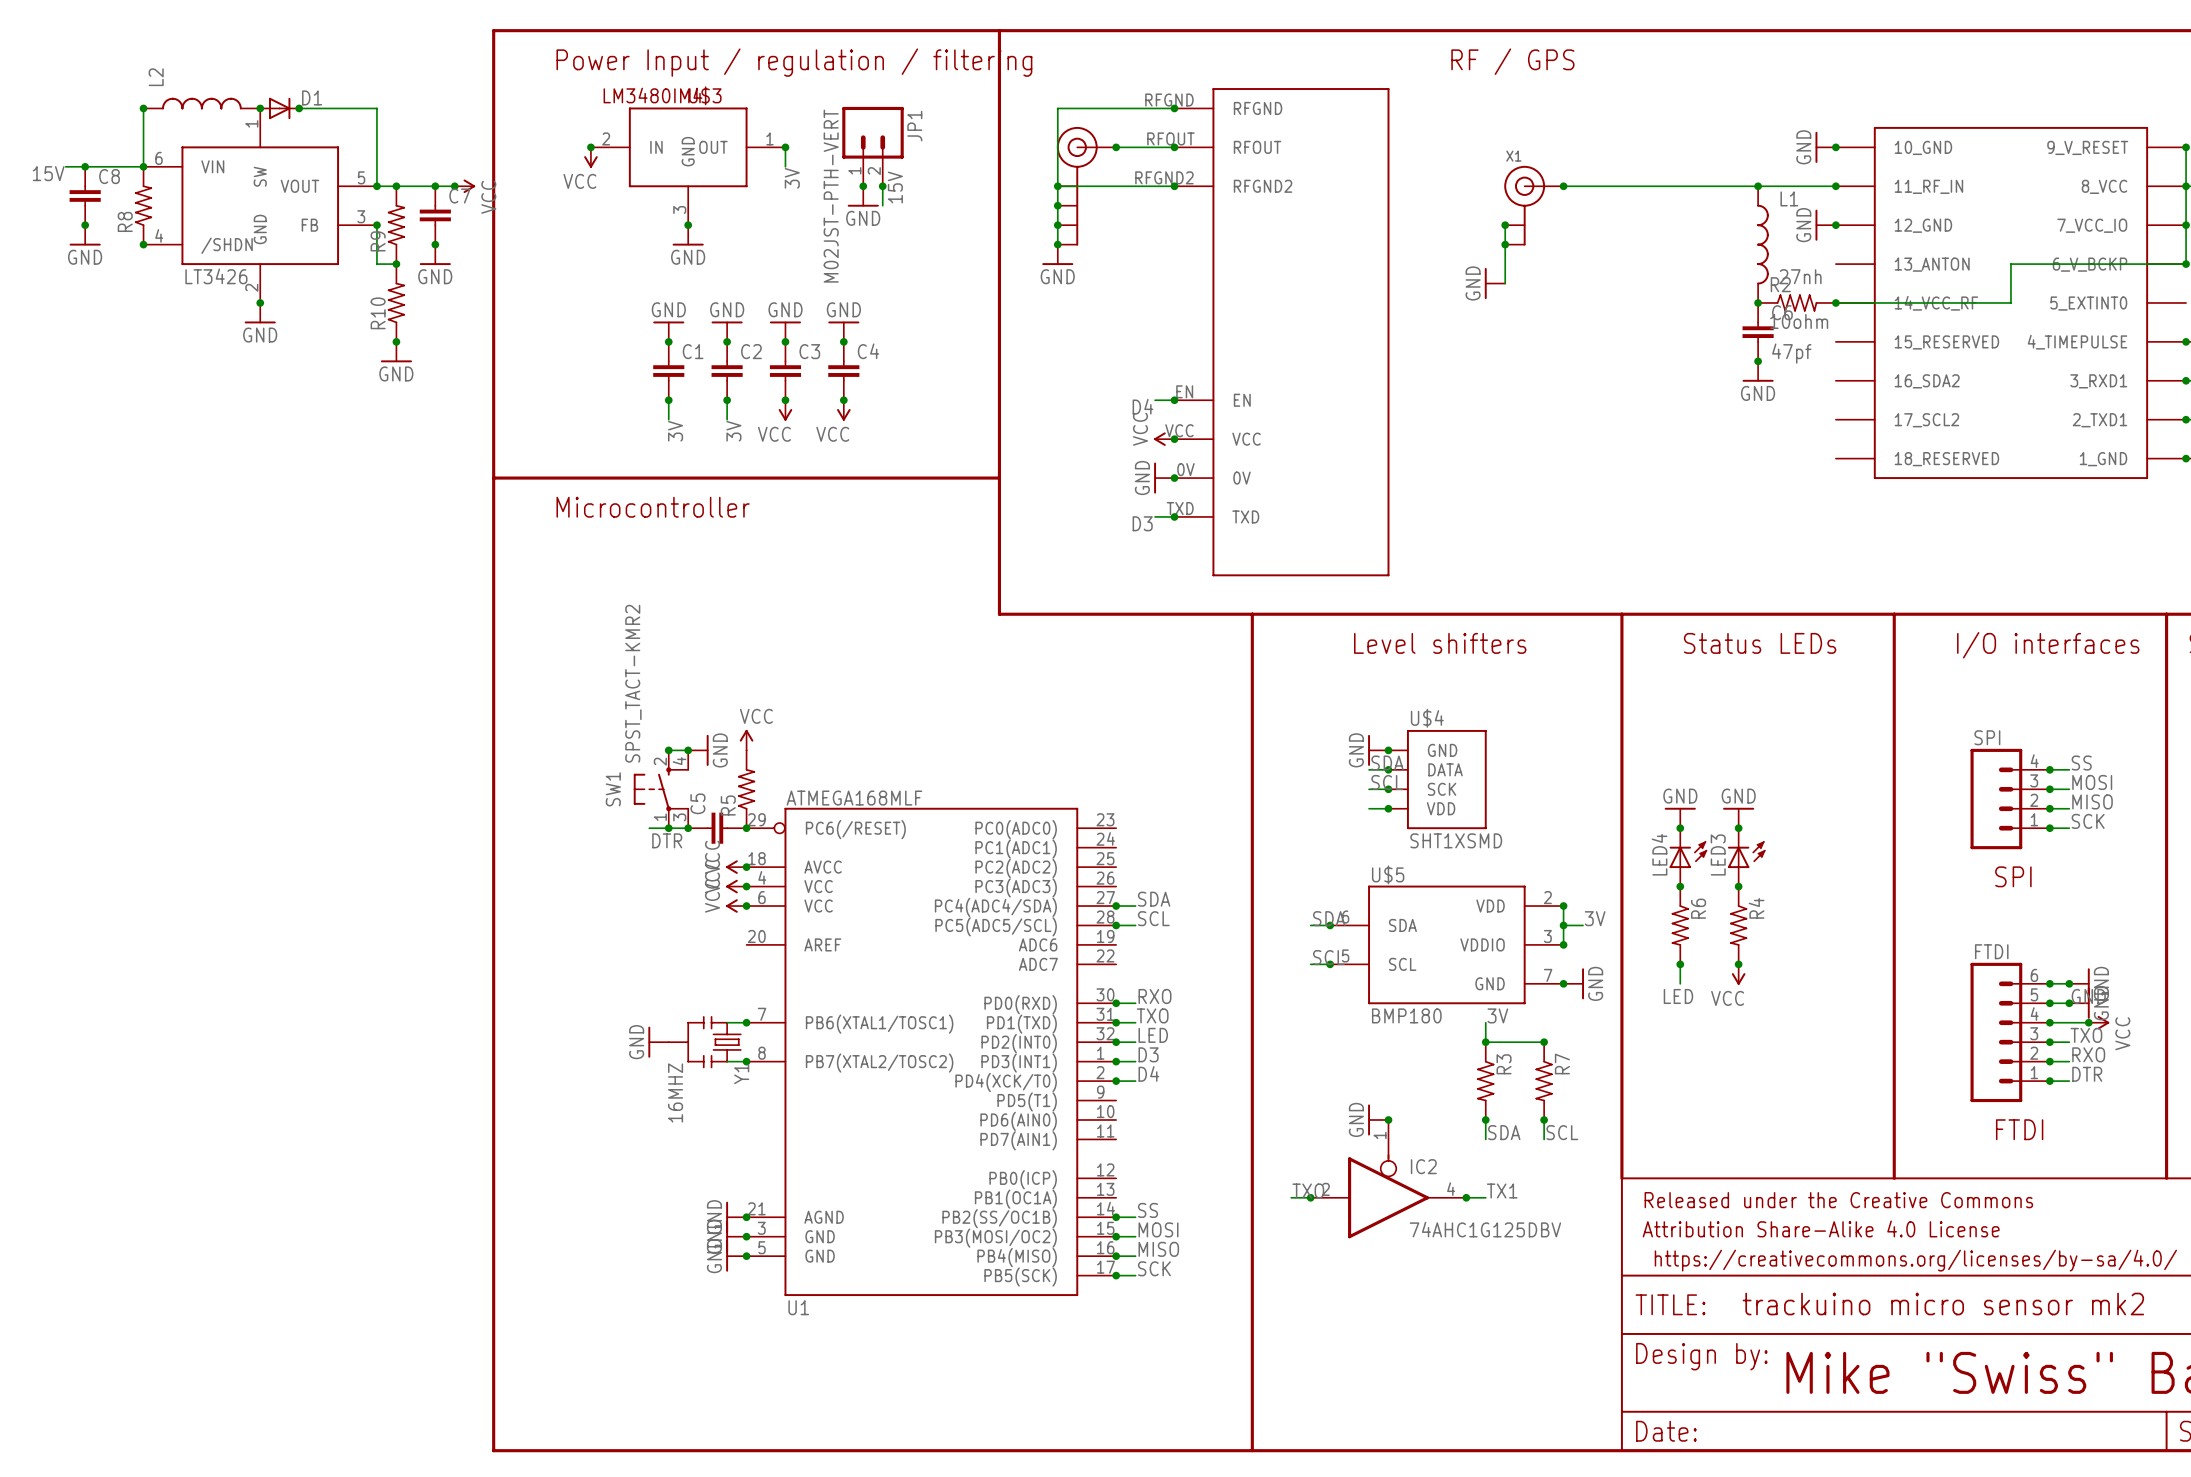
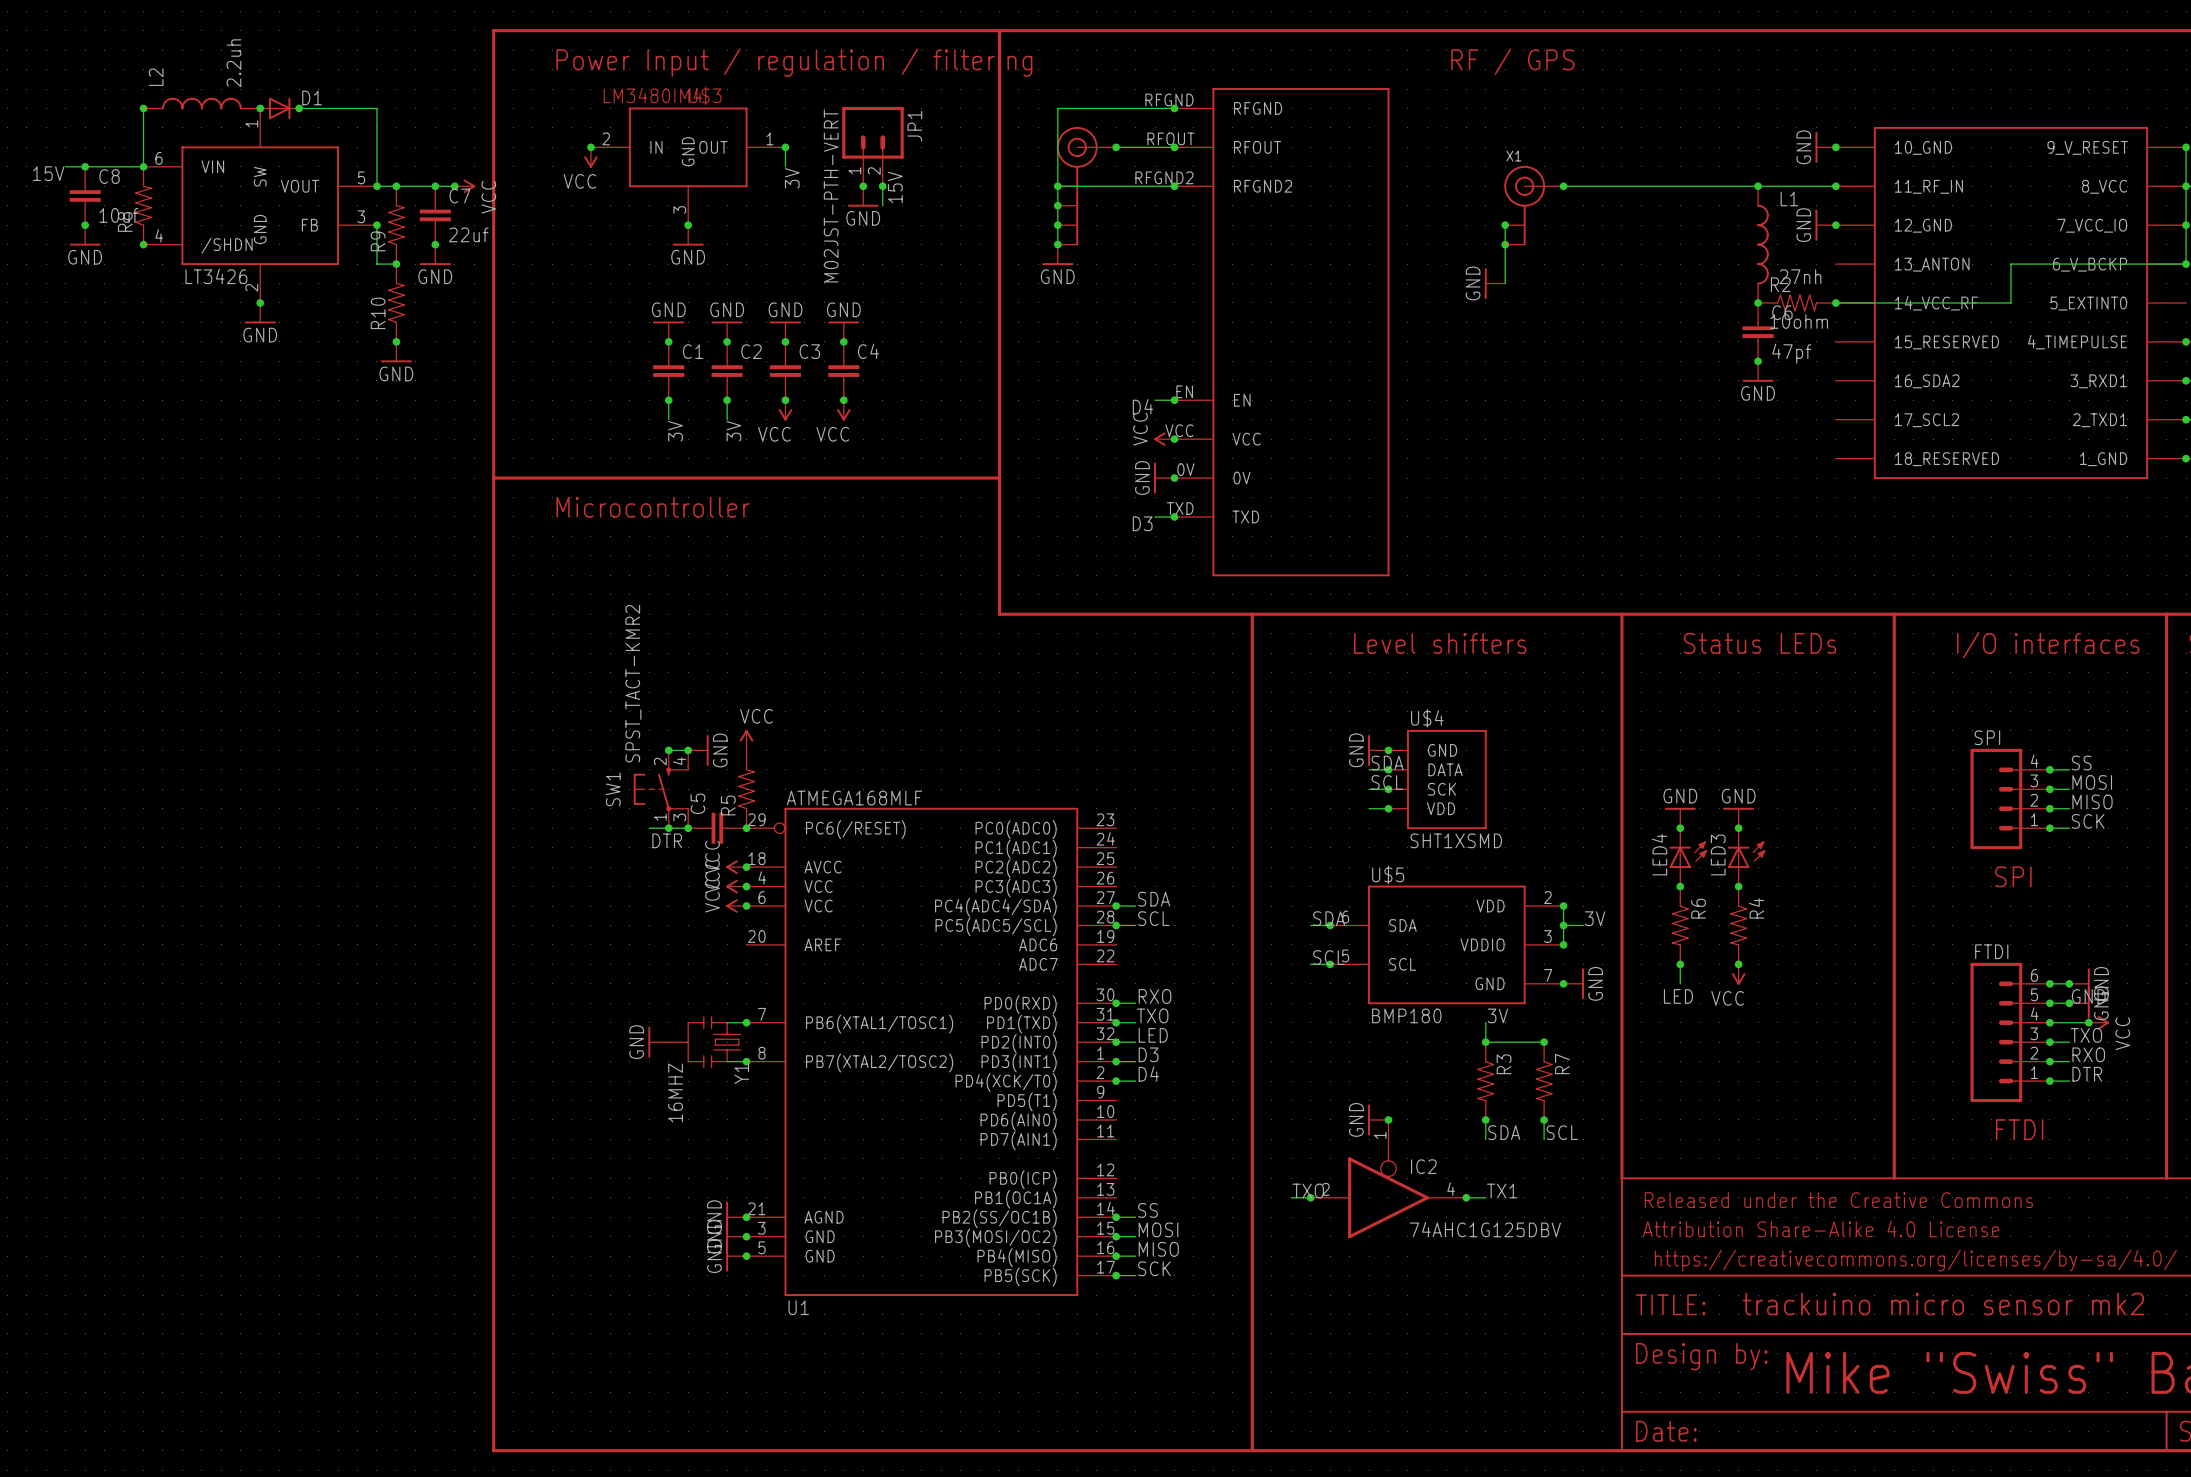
L2 value: none -> 2.2uh (233, 63)
C8 value: none -> 10uf (118, 215)
C7 value: none -> 22uf (468, 234)

